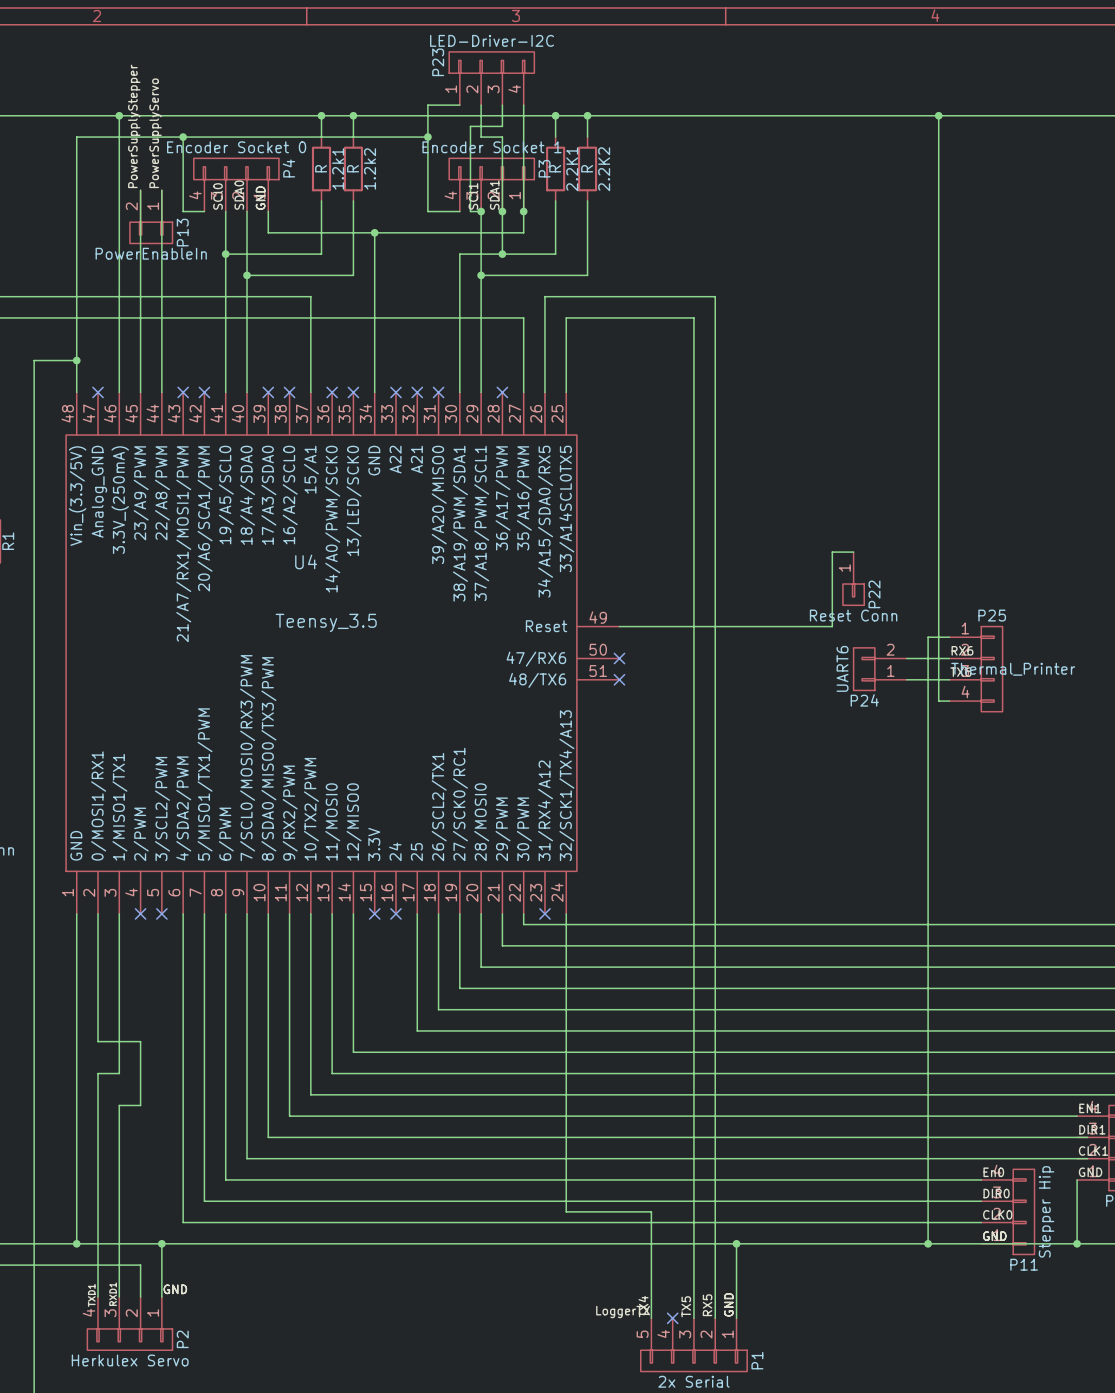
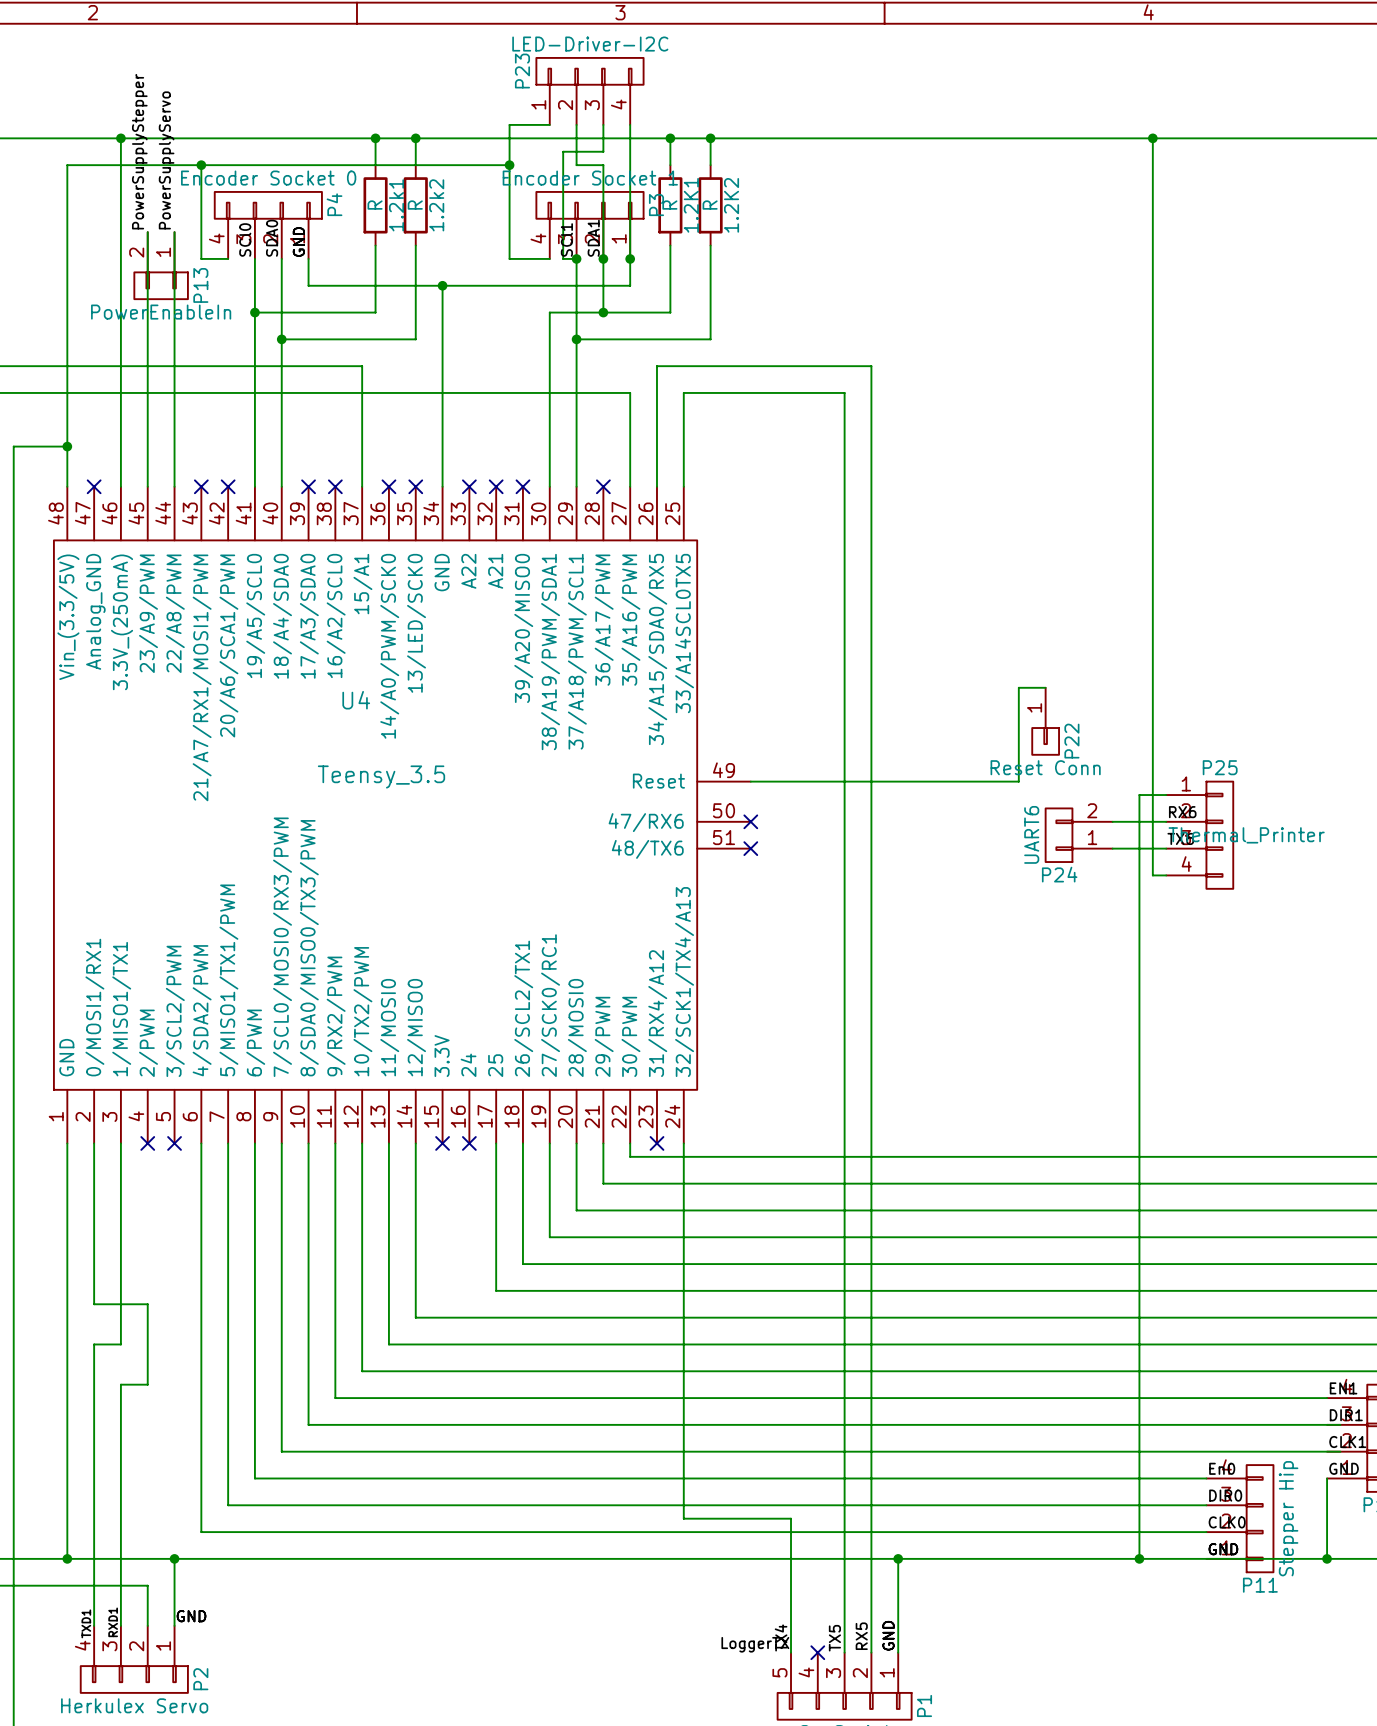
2.2K1 name: 2.2K1 (572, 169) -> 1.2K1 (691, 205)
2.2K2 name: 2.2K2 (604, 169) -> 1.2K2 (731, 205)

